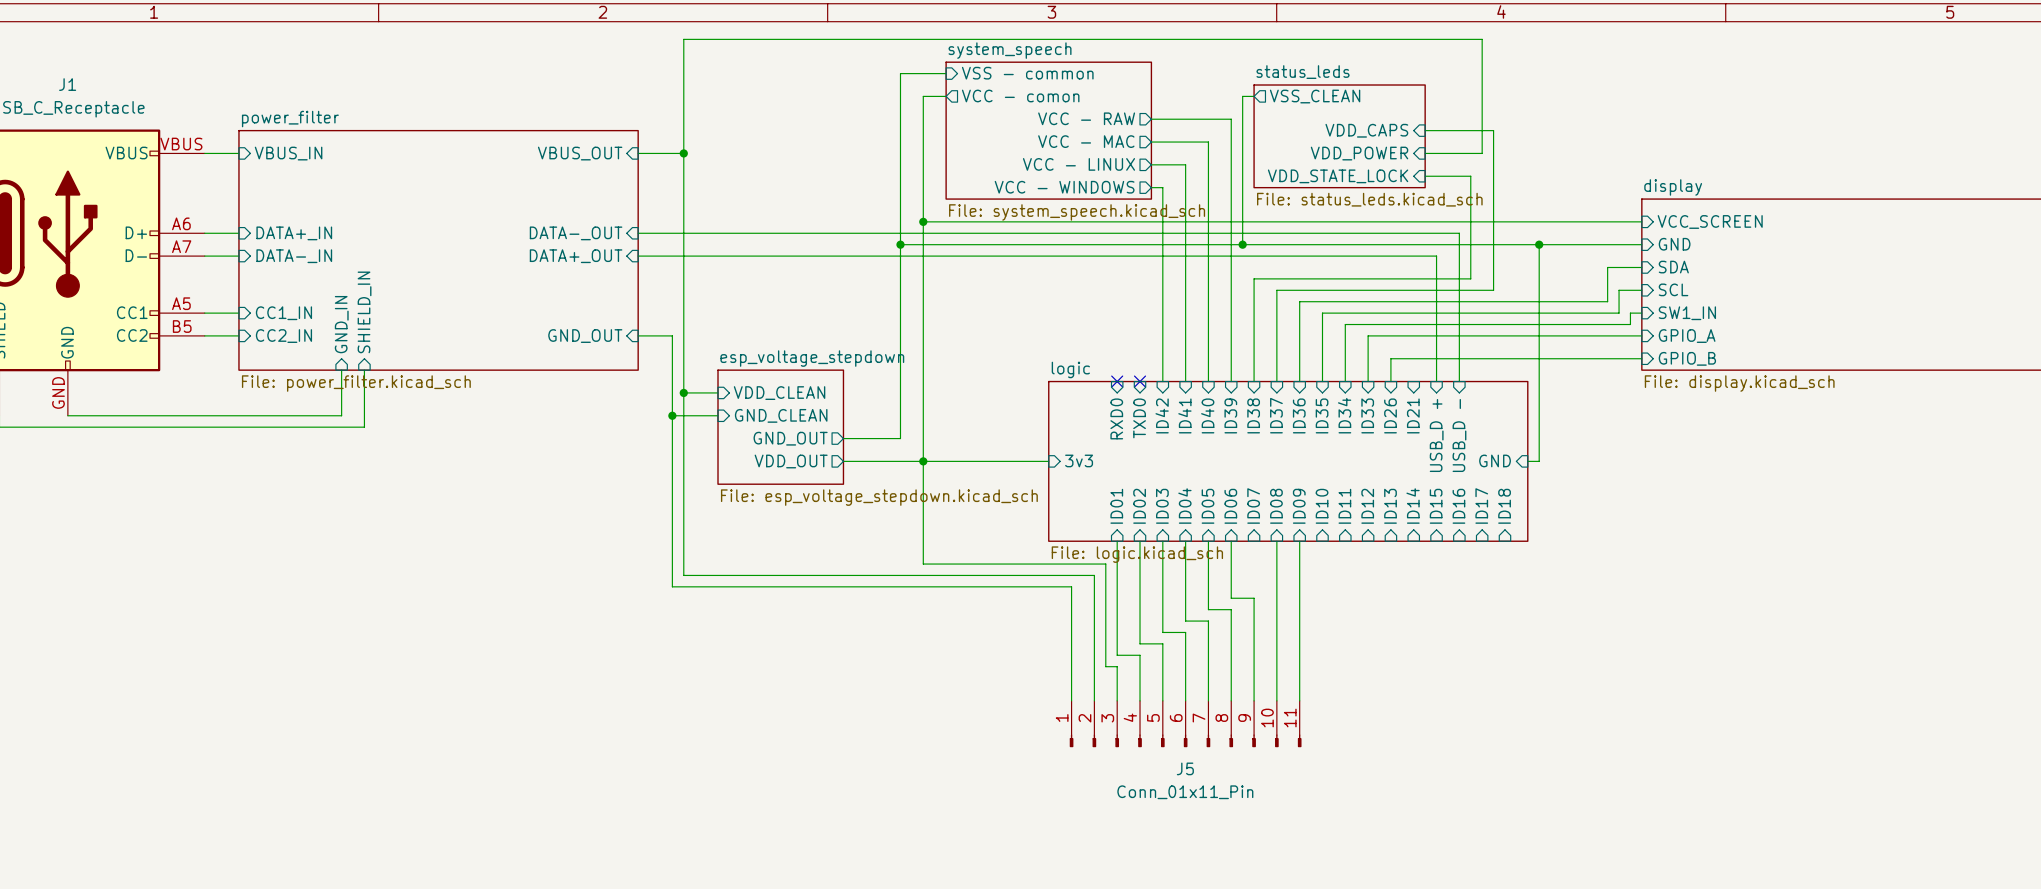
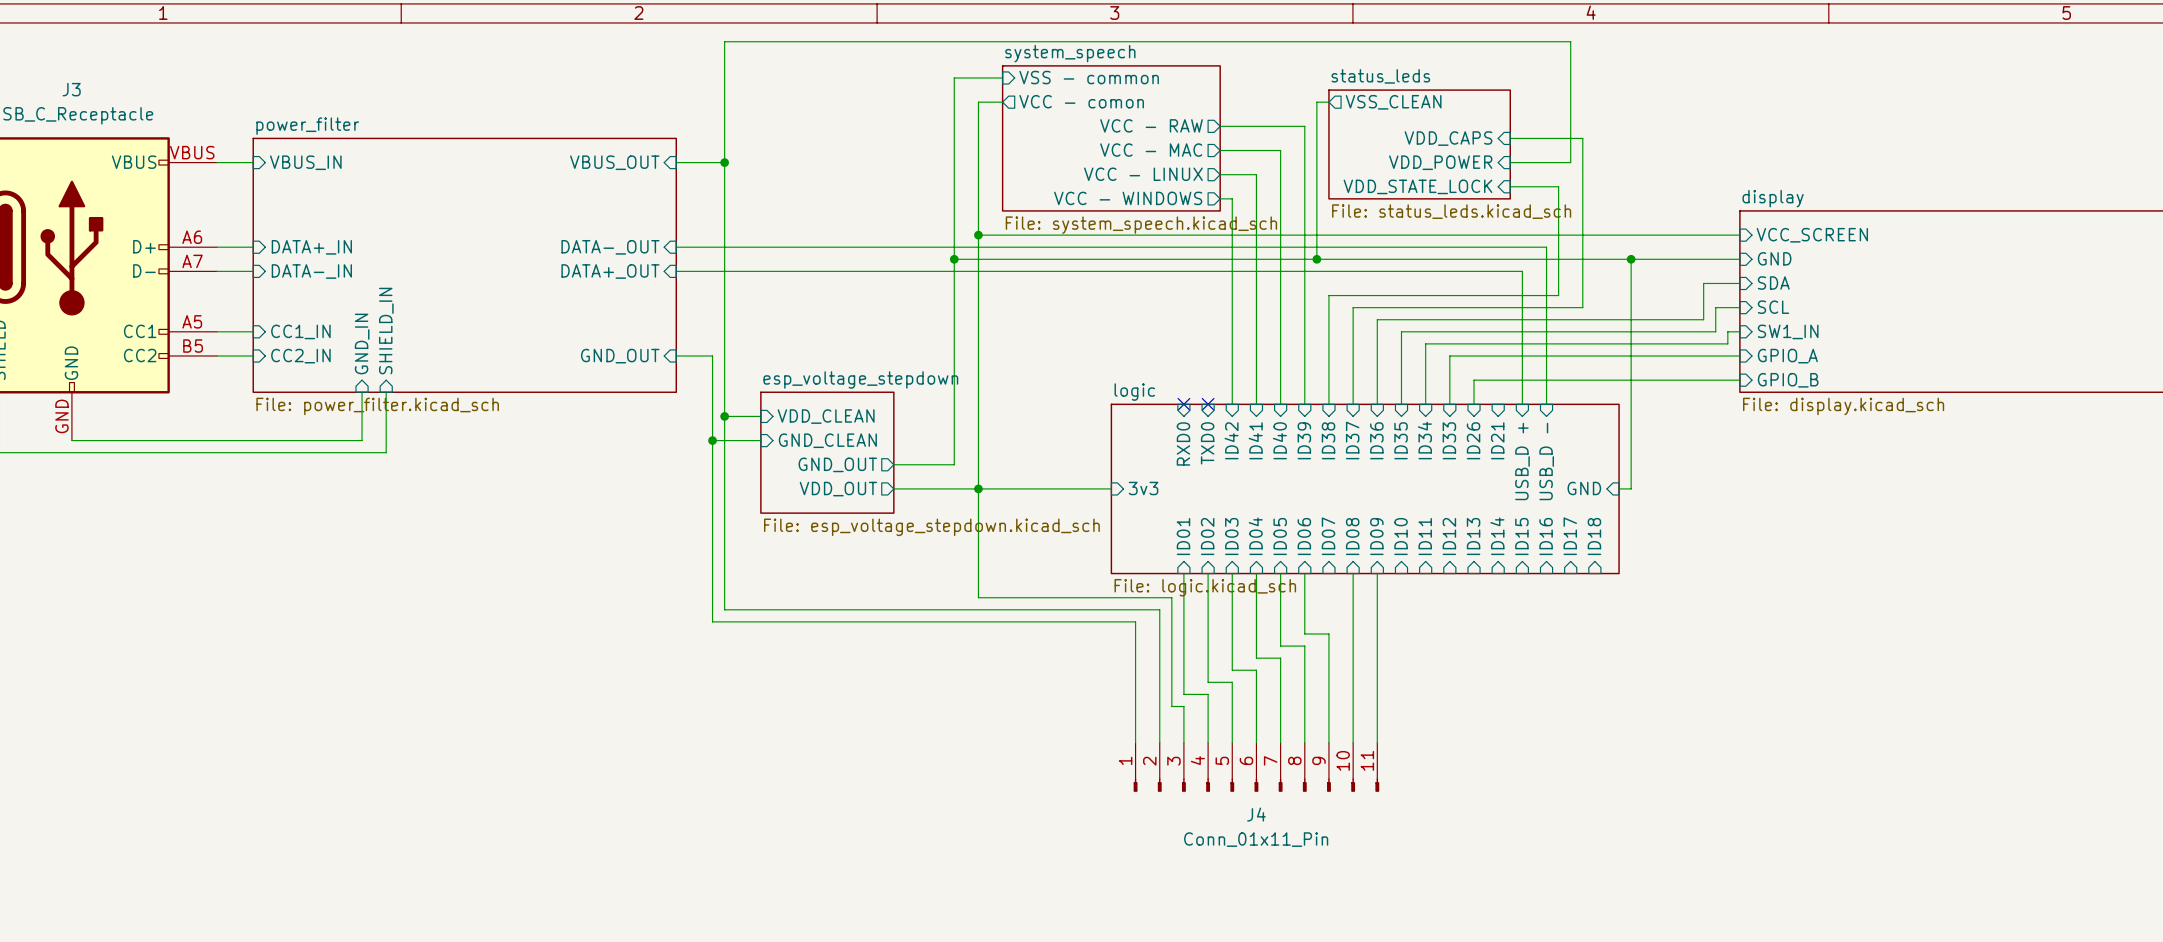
J1 name: J1 (67, 84) -> J3 (71, 89)
J5 name: J5 (1185, 768) -> J4 (1256, 814)

